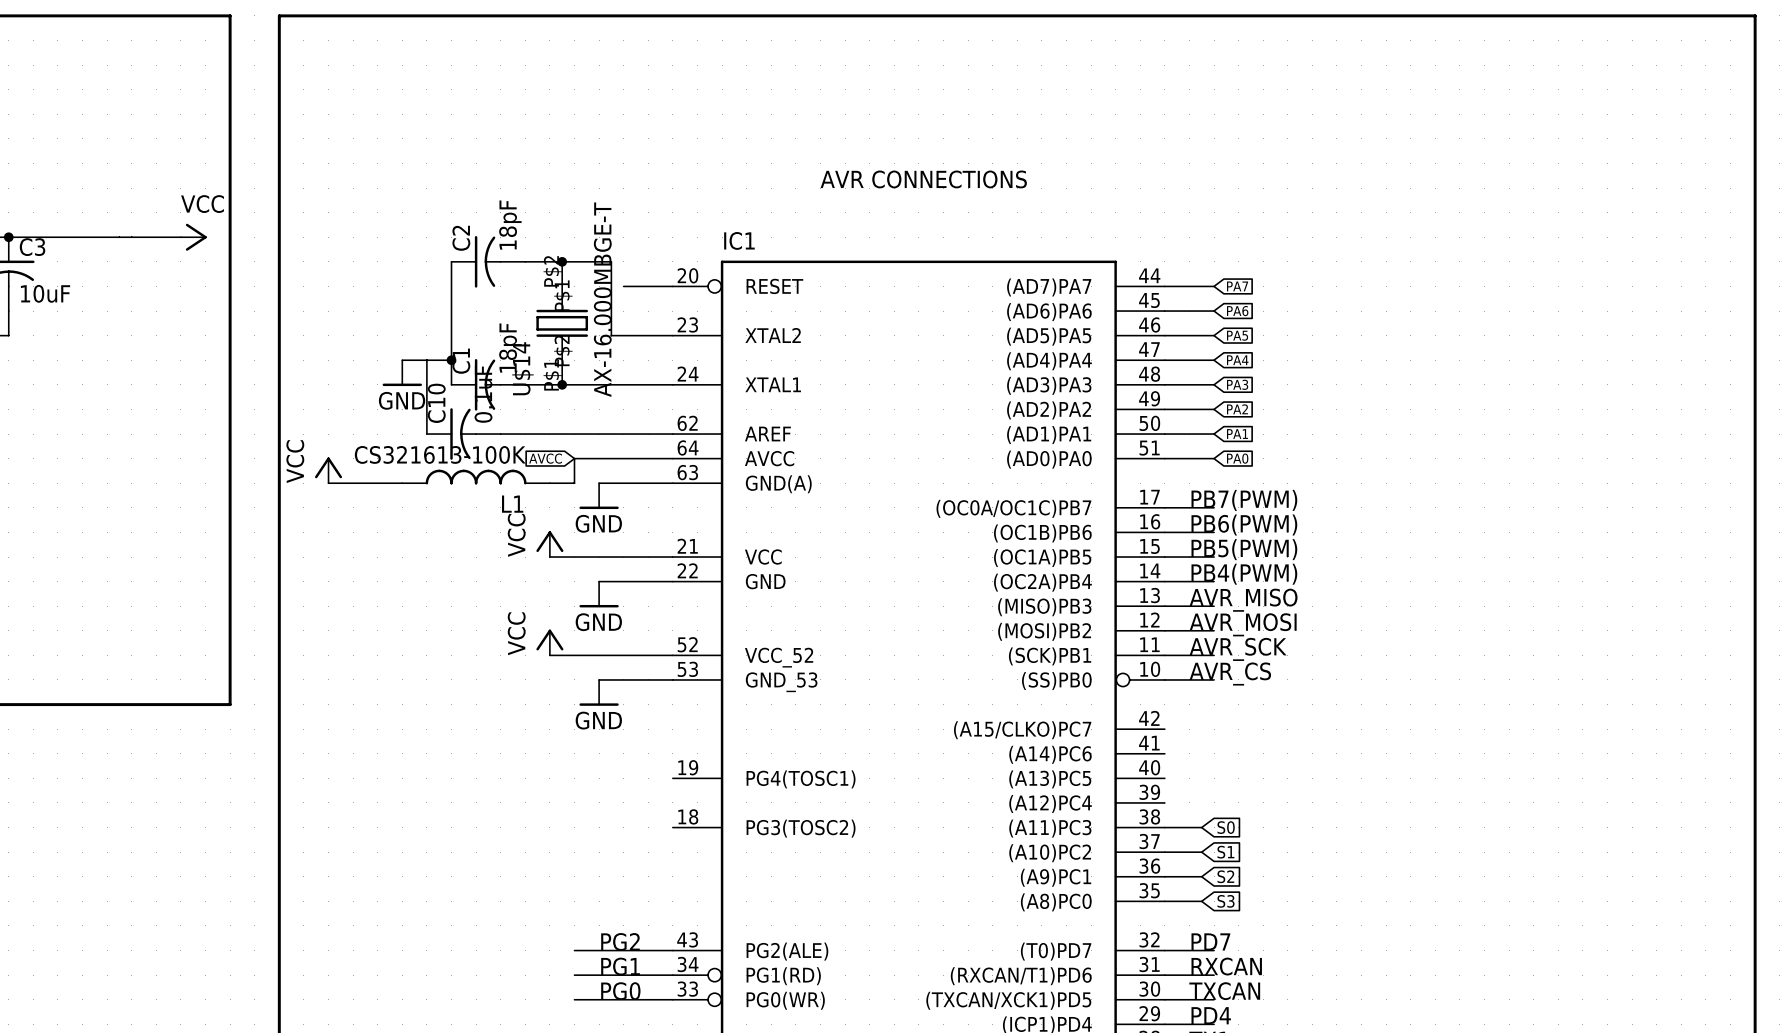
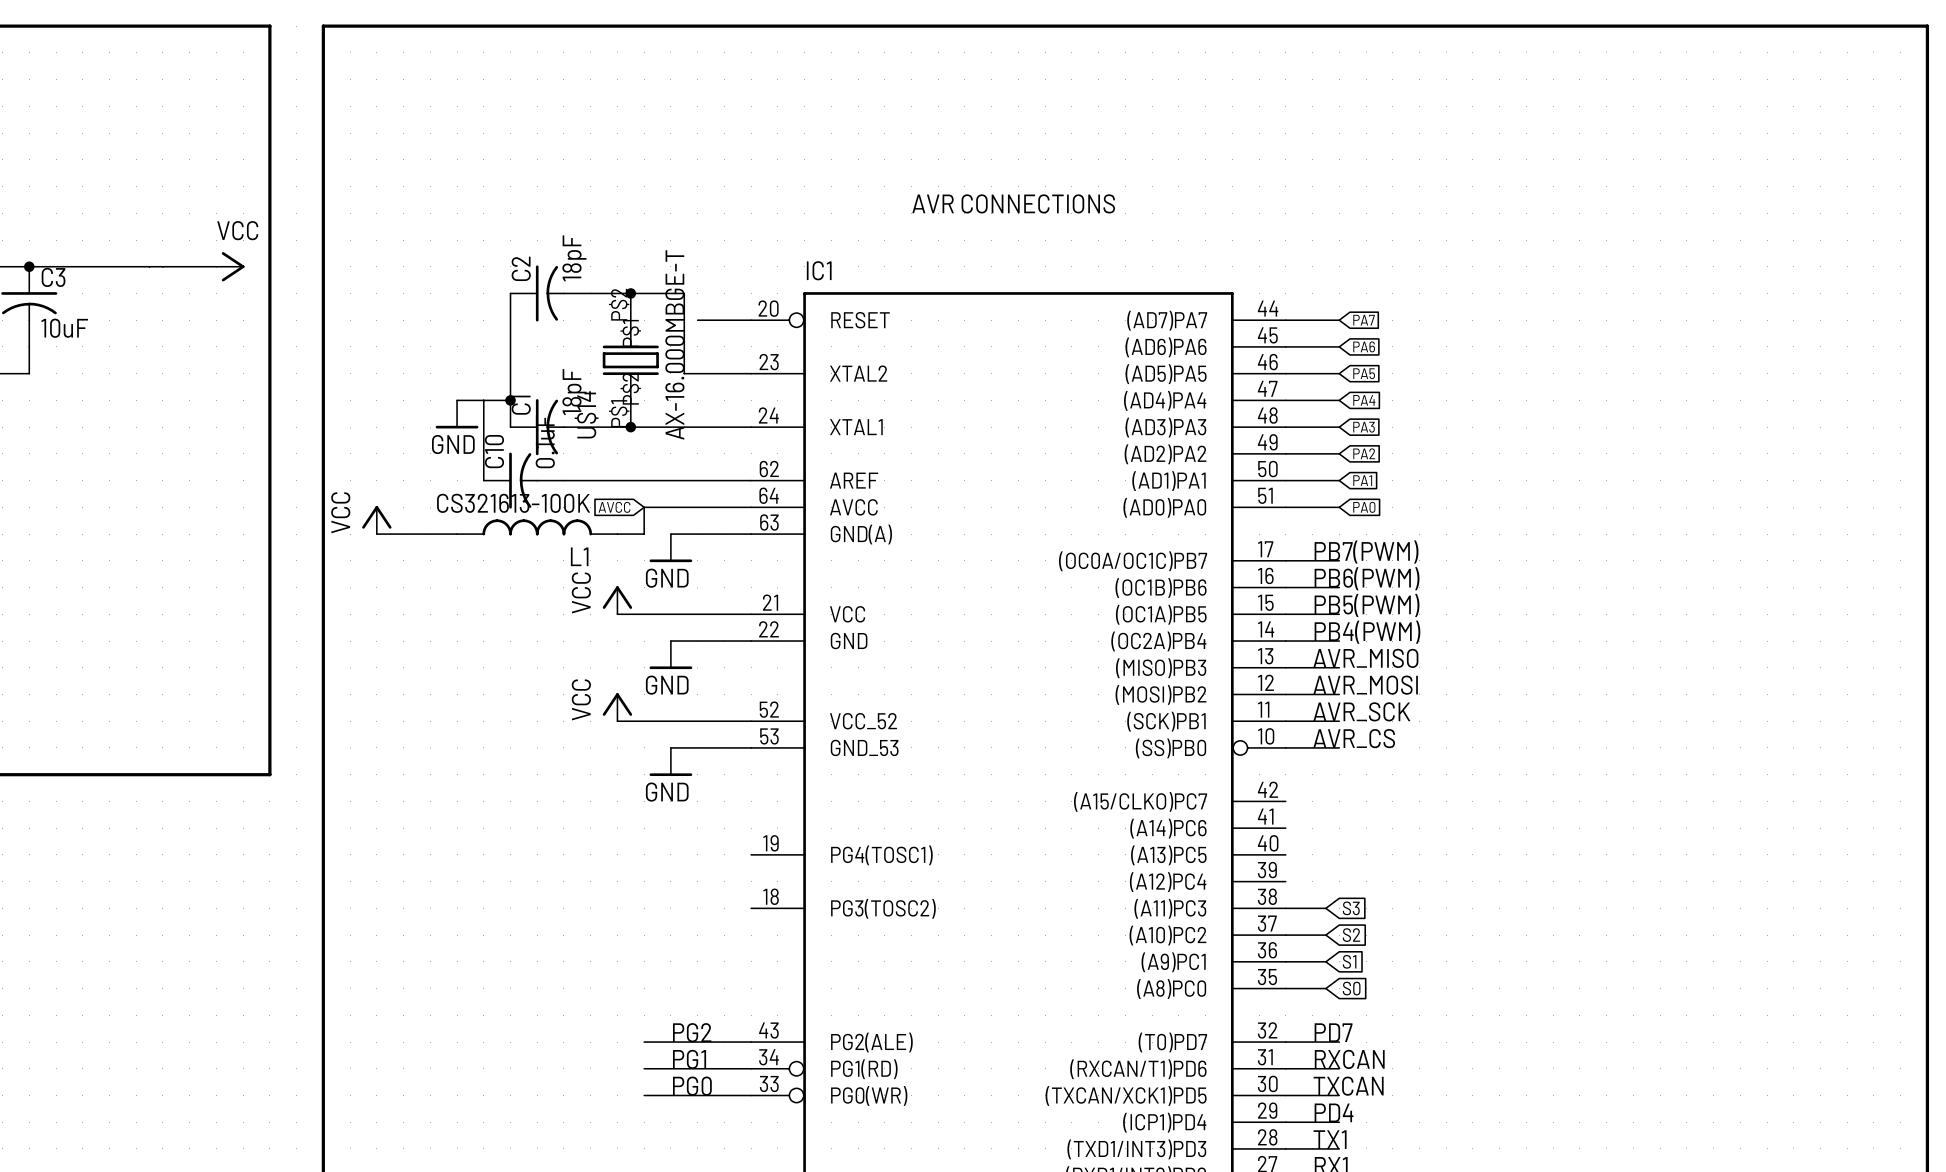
global label: S0 (1226, 827) -> S3 (1351, 908)
global label: S1 (1225, 852) -> S2 (1351, 935)
global label: S2 (1225, 876) -> S1 (1349, 961)
global label: S3 (1226, 901) -> S0 (1351, 988)

